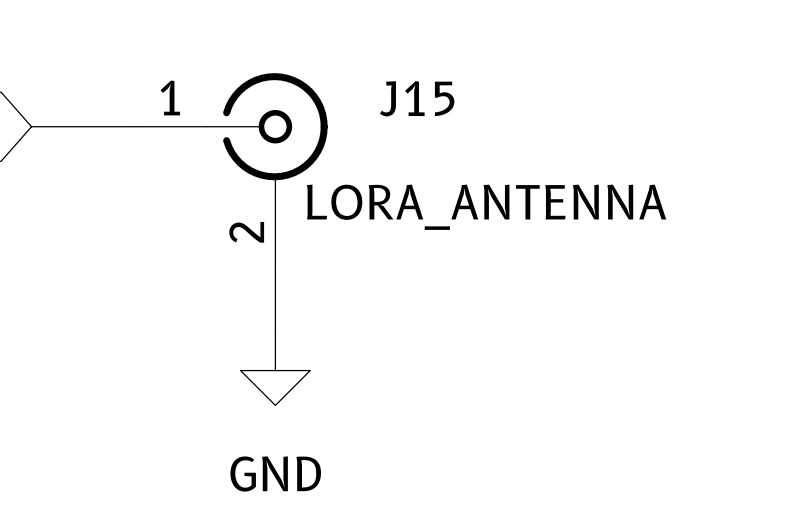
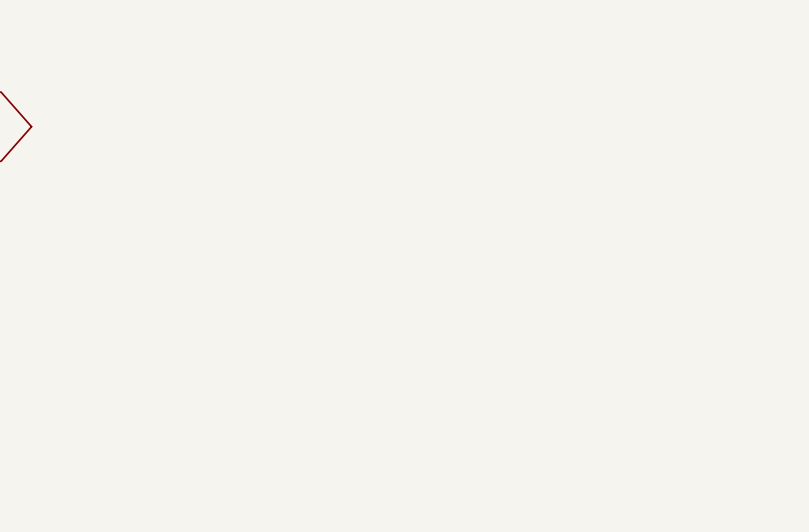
wire: (31, 126) (136, 126) -> none
J15: LORA_ANTENNA (231, 169) -> none
wire: (275, 266) (275, 335) -> none
power symbol: GND (275, 370) -> none

